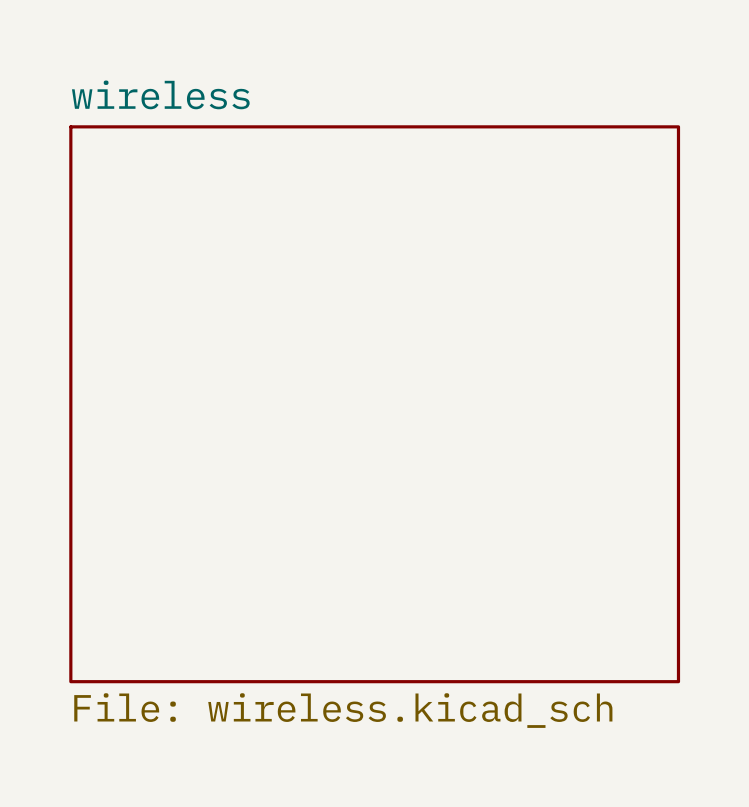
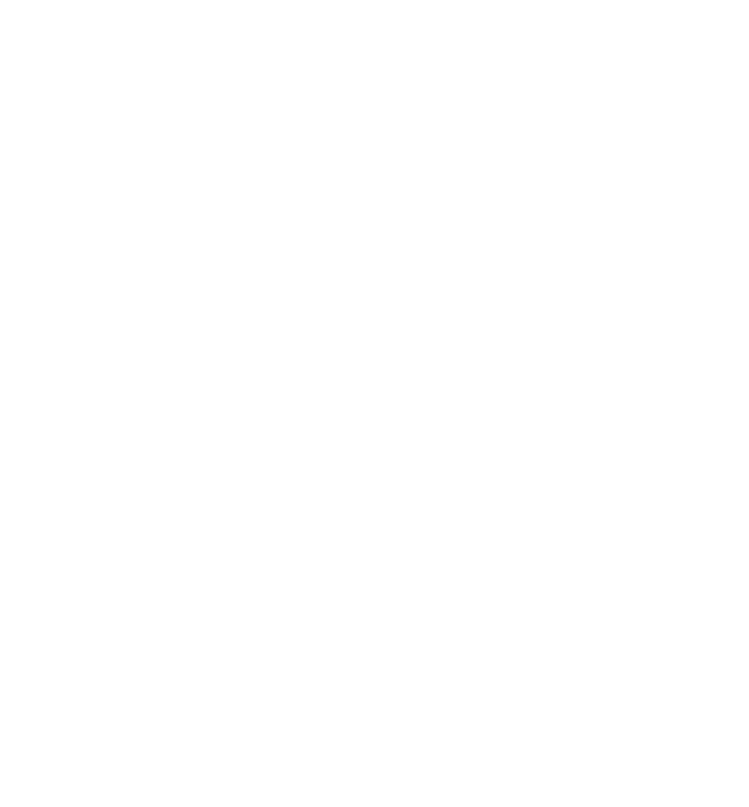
sheet wireless: File: wireless.kicad_sch (374, 404) -> none

